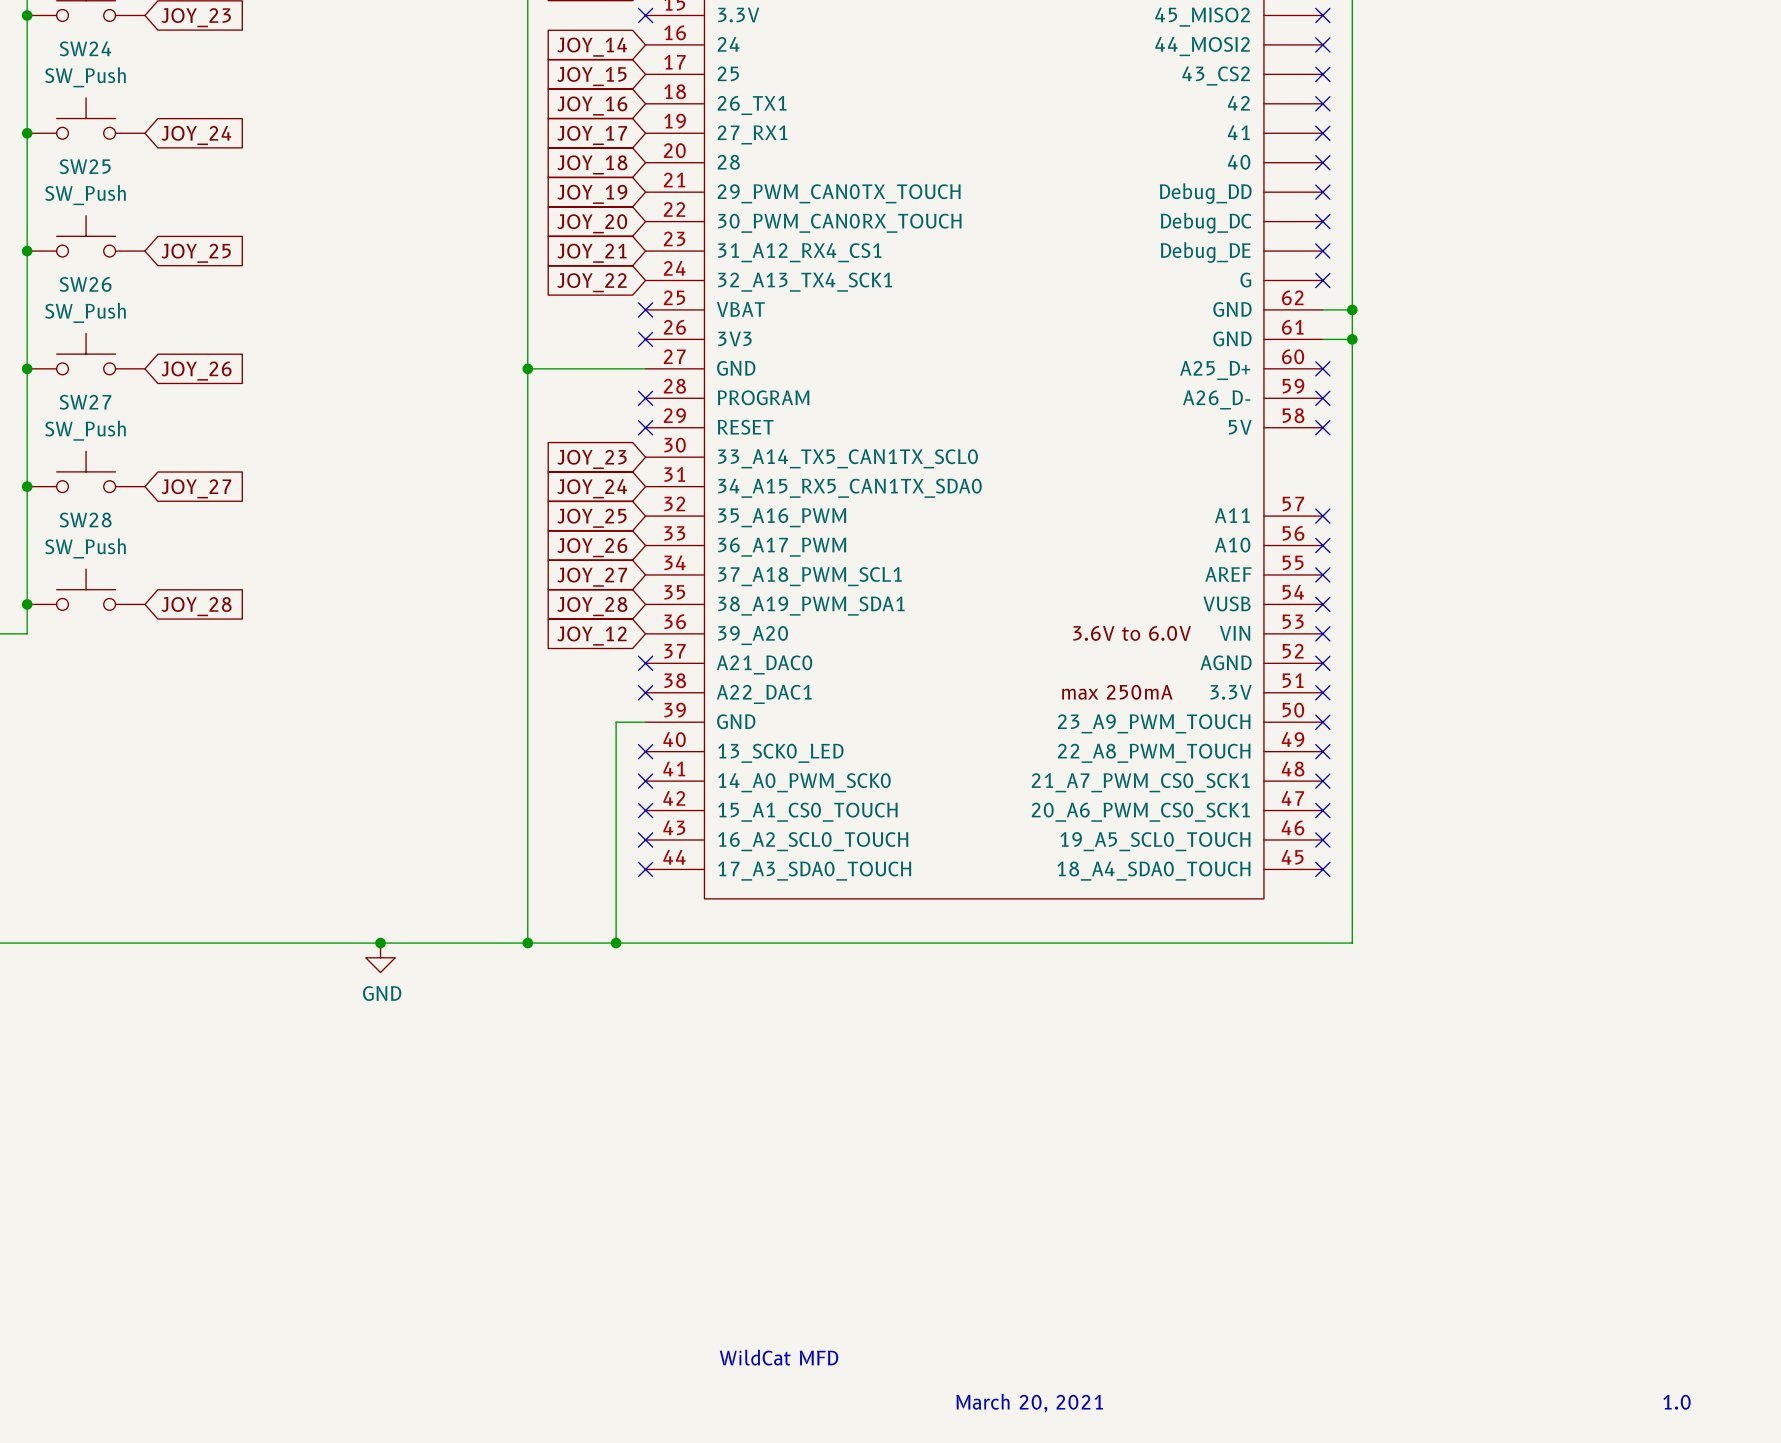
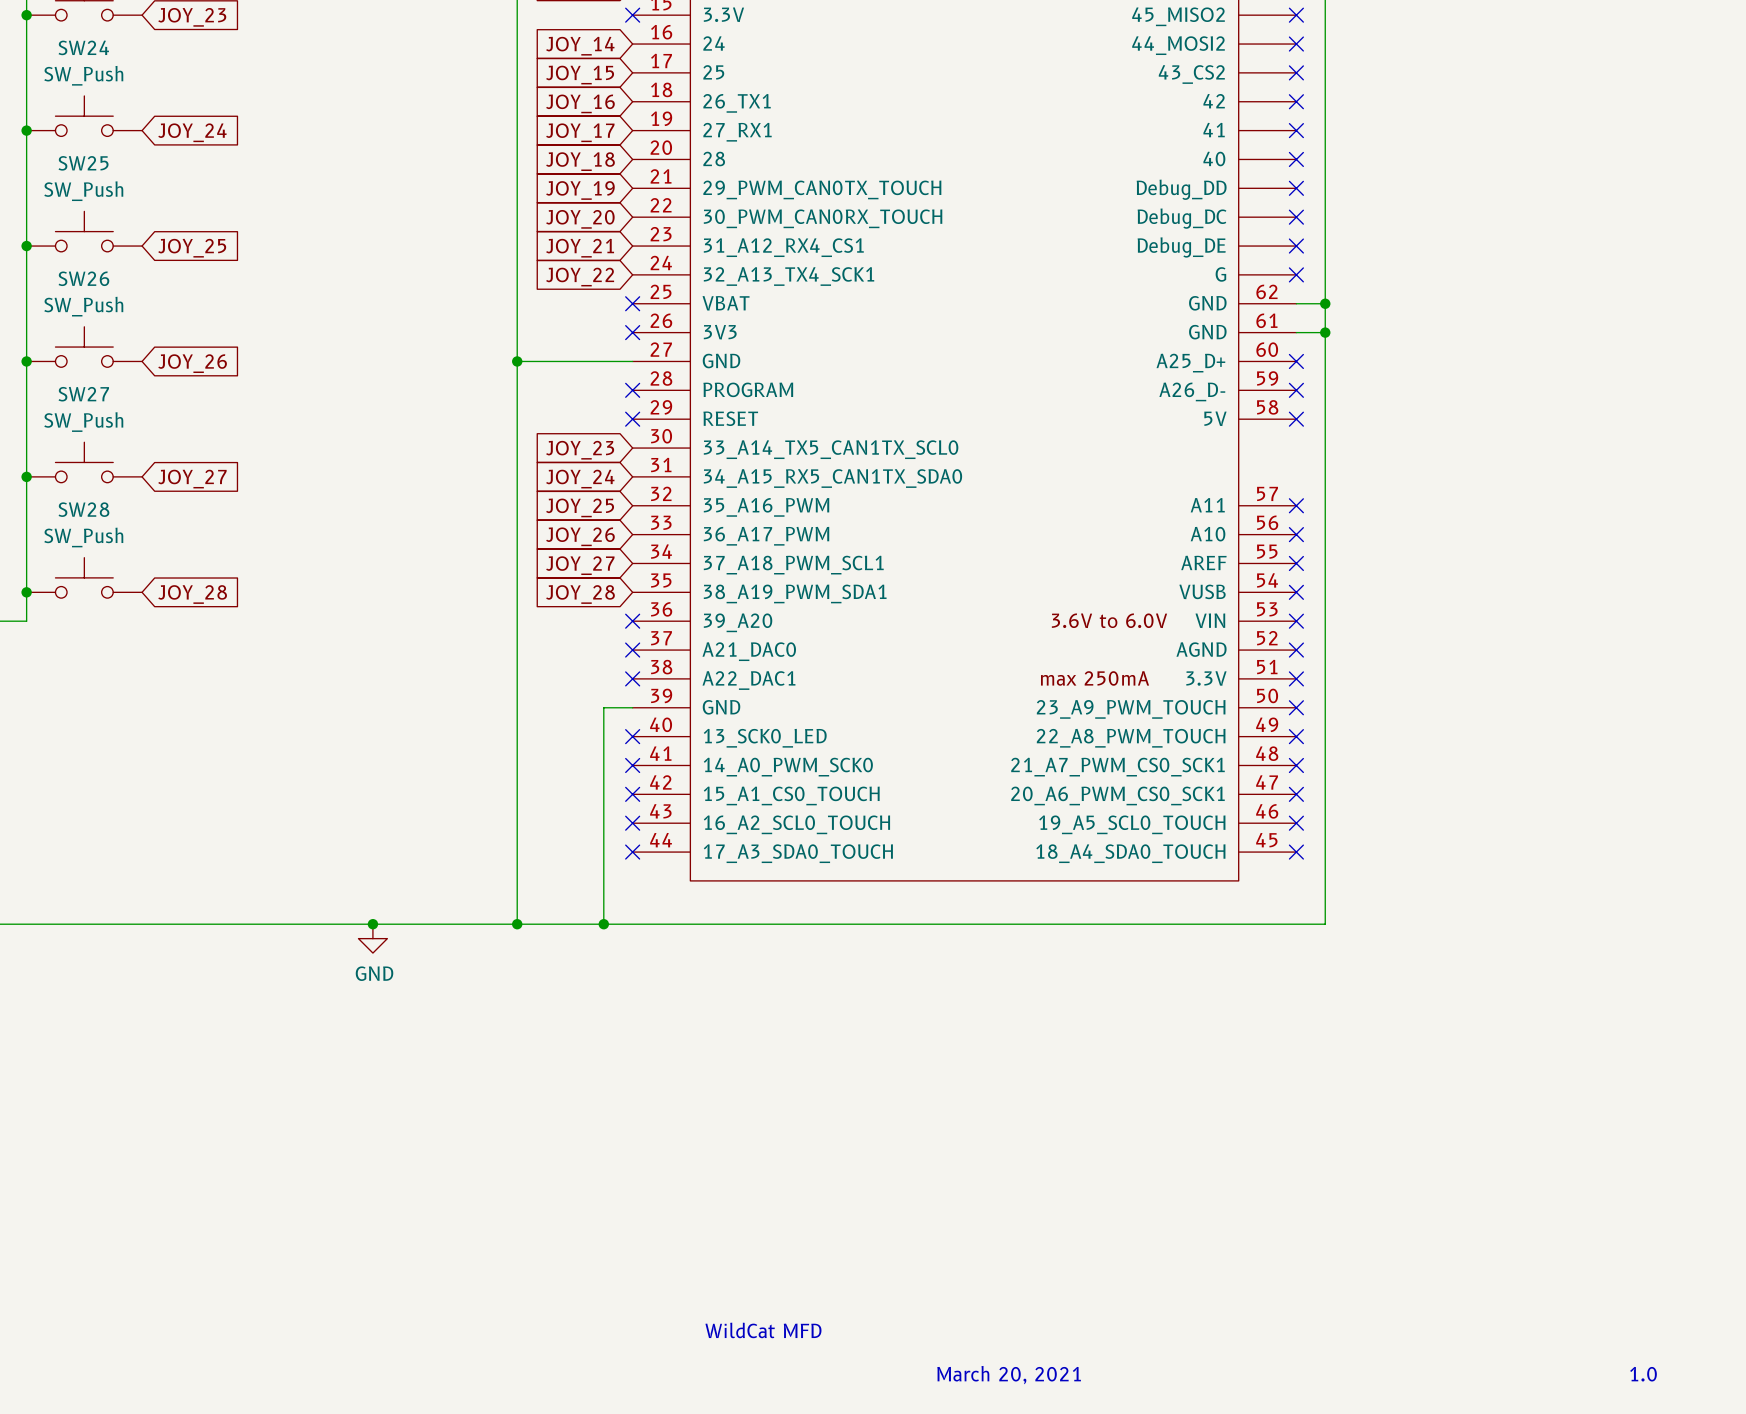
no-connect mark: none -> (632, 621)
global label: JOY_12 (591, 636) -> none

